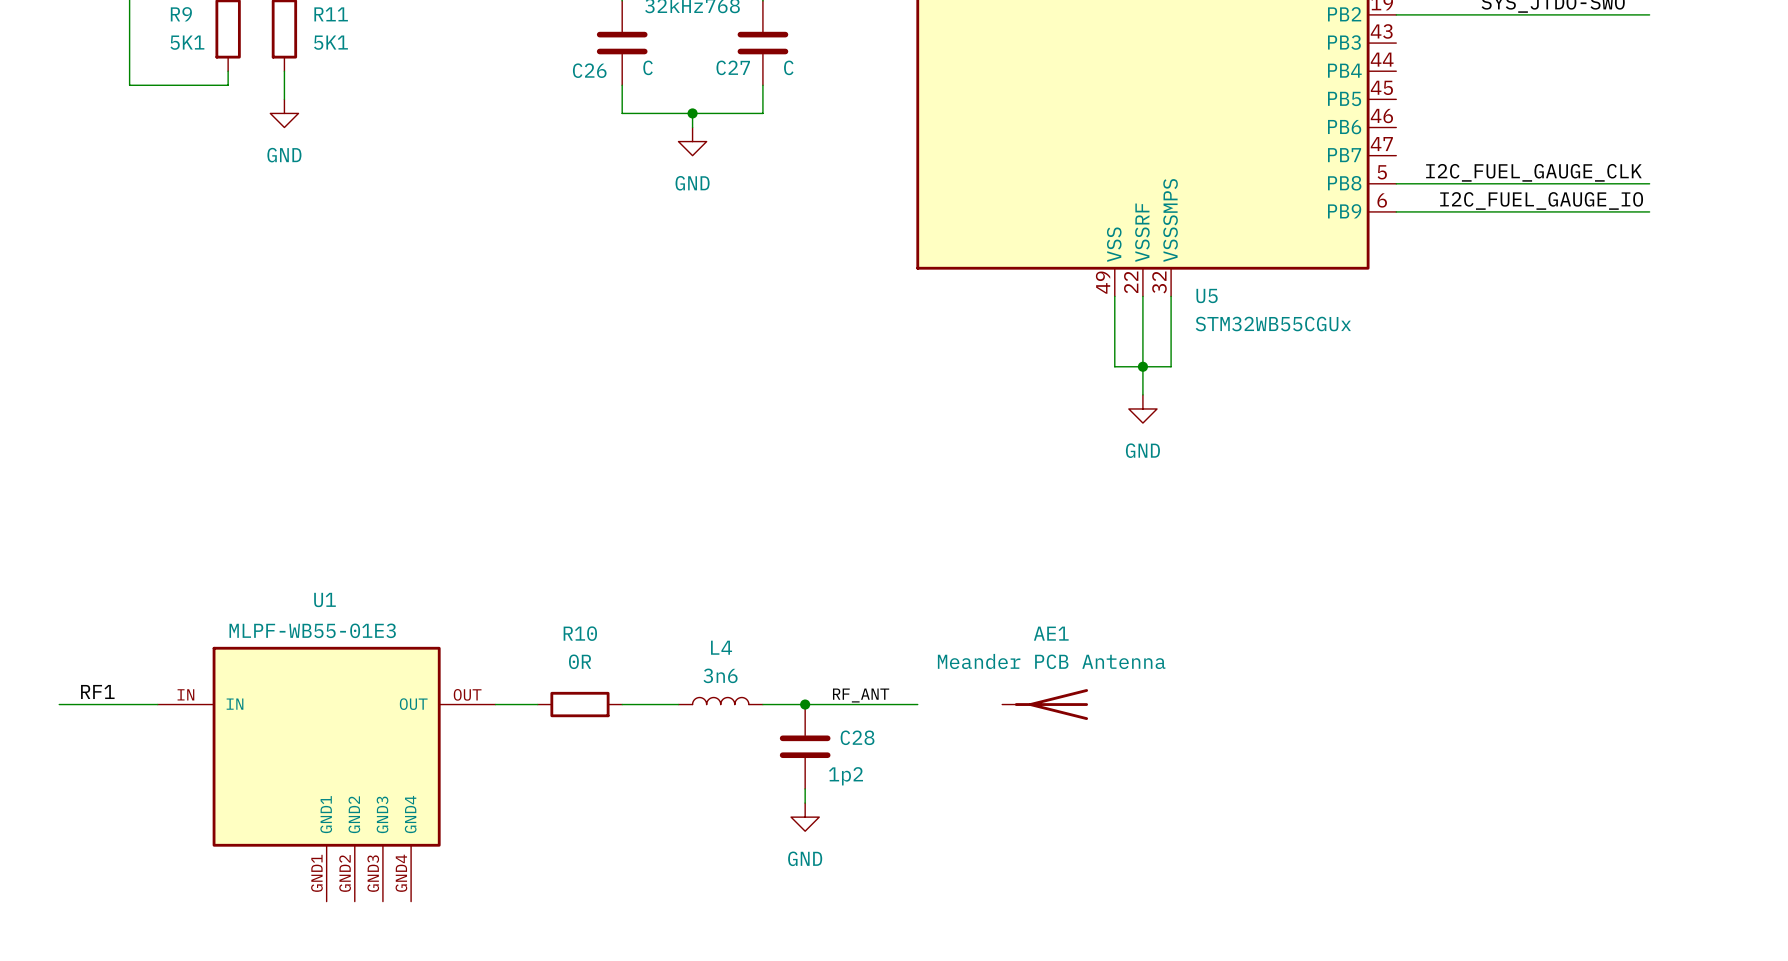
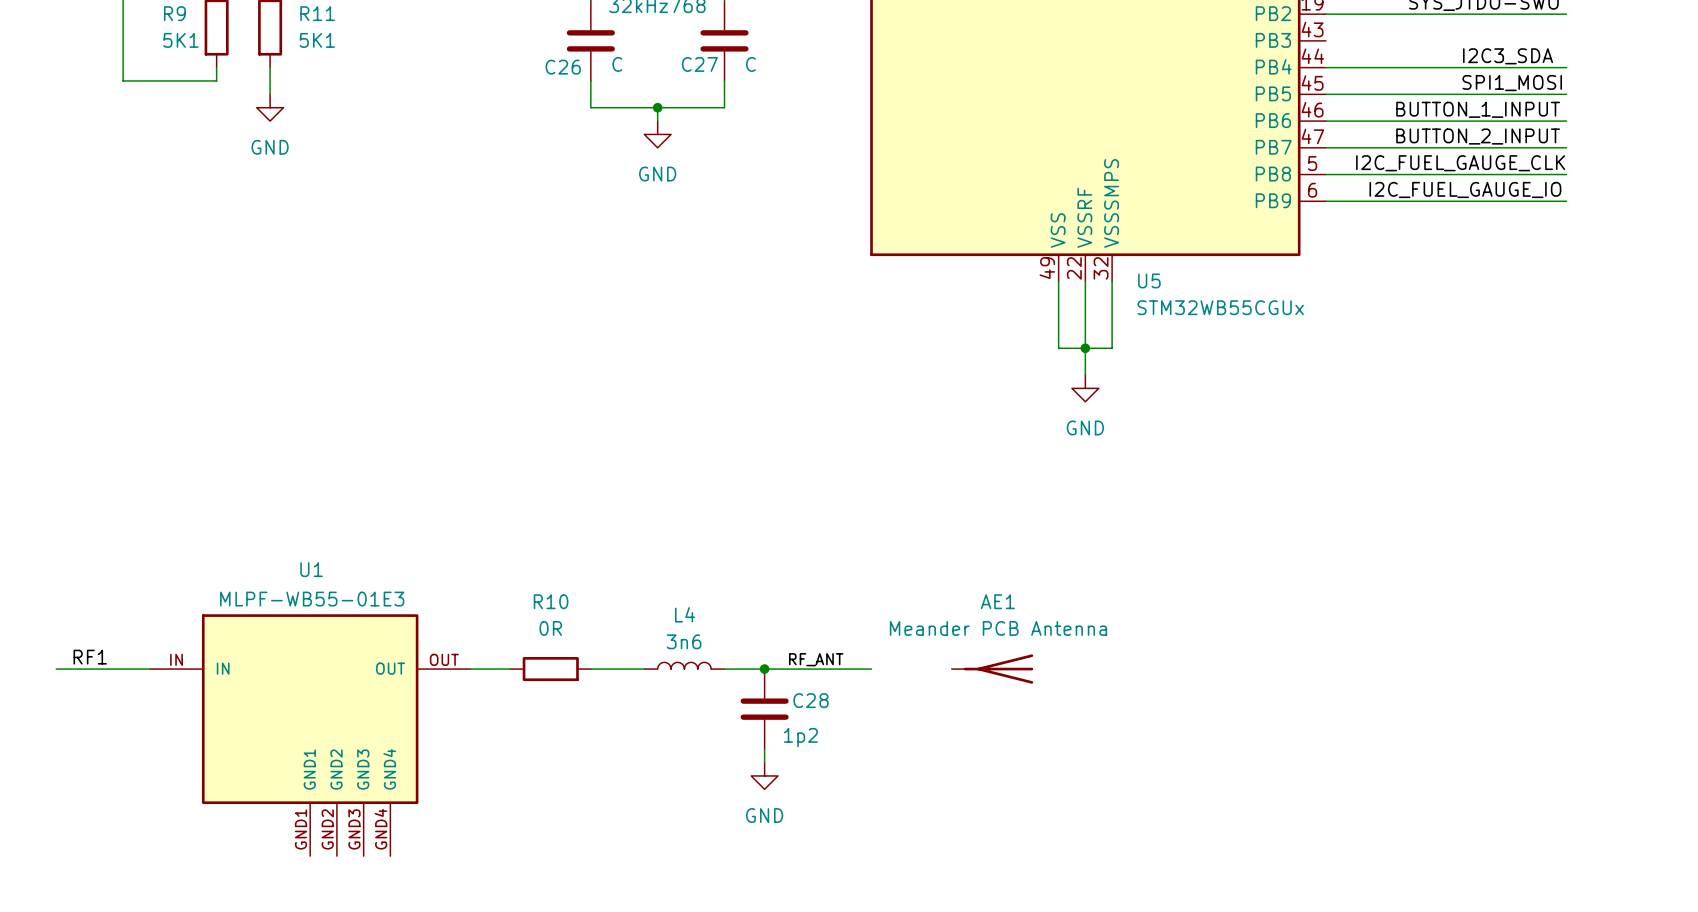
label: none -> I2C3_SDA (1508, 56)
wire: none -> (1325, 67) (1566, 67)
label: none -> SPI1_MOSI (1512, 83)
wire: none -> (1325, 94) (1566, 94)
label: none -> BUTTON_1_INPUT (1478, 109)
wire: none -> (1325, 121) (1566, 121)
label: none -> BUTTON_2_INPUT (1478, 136)
wire: none -> (1325, 147) (1566, 147)

